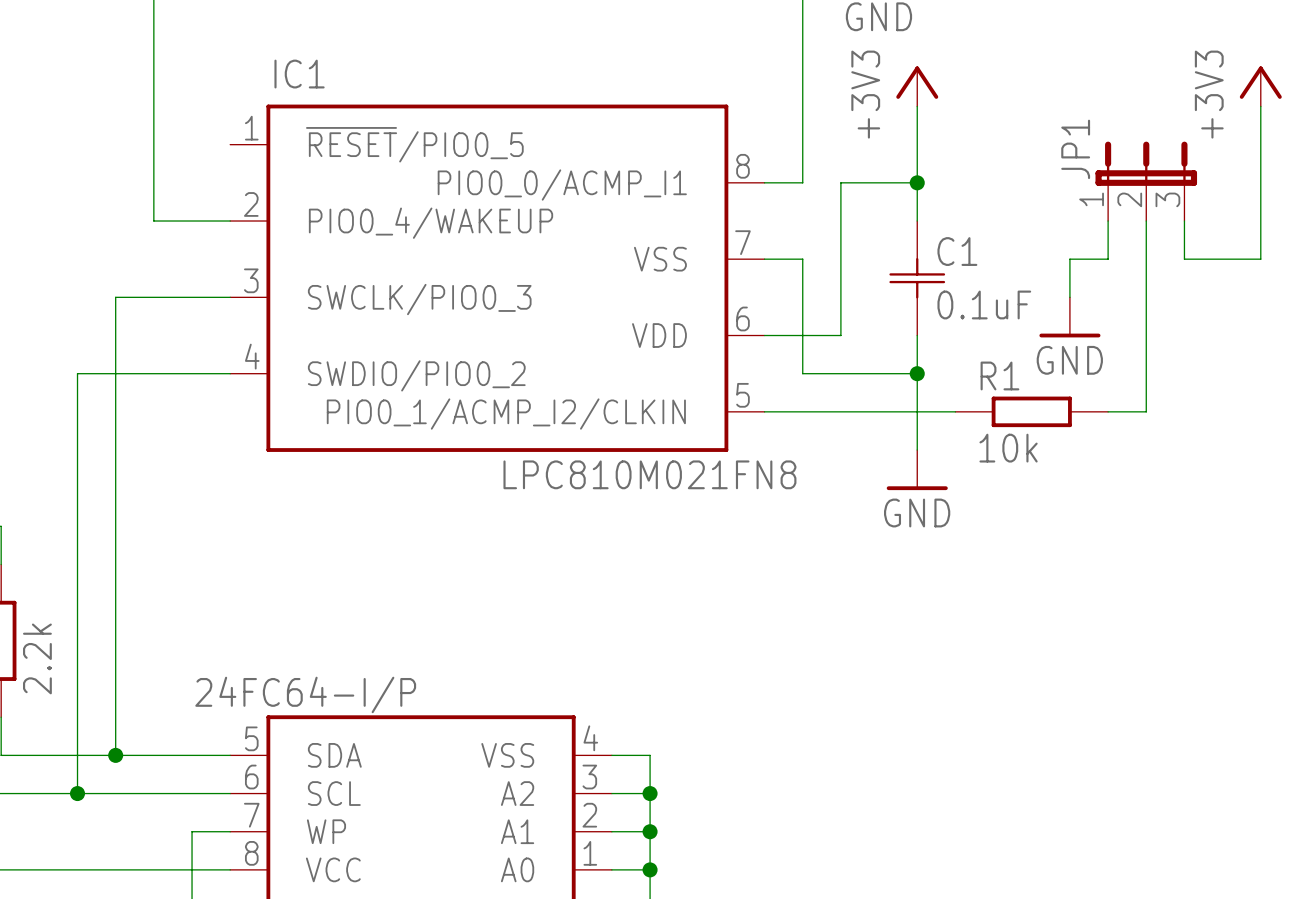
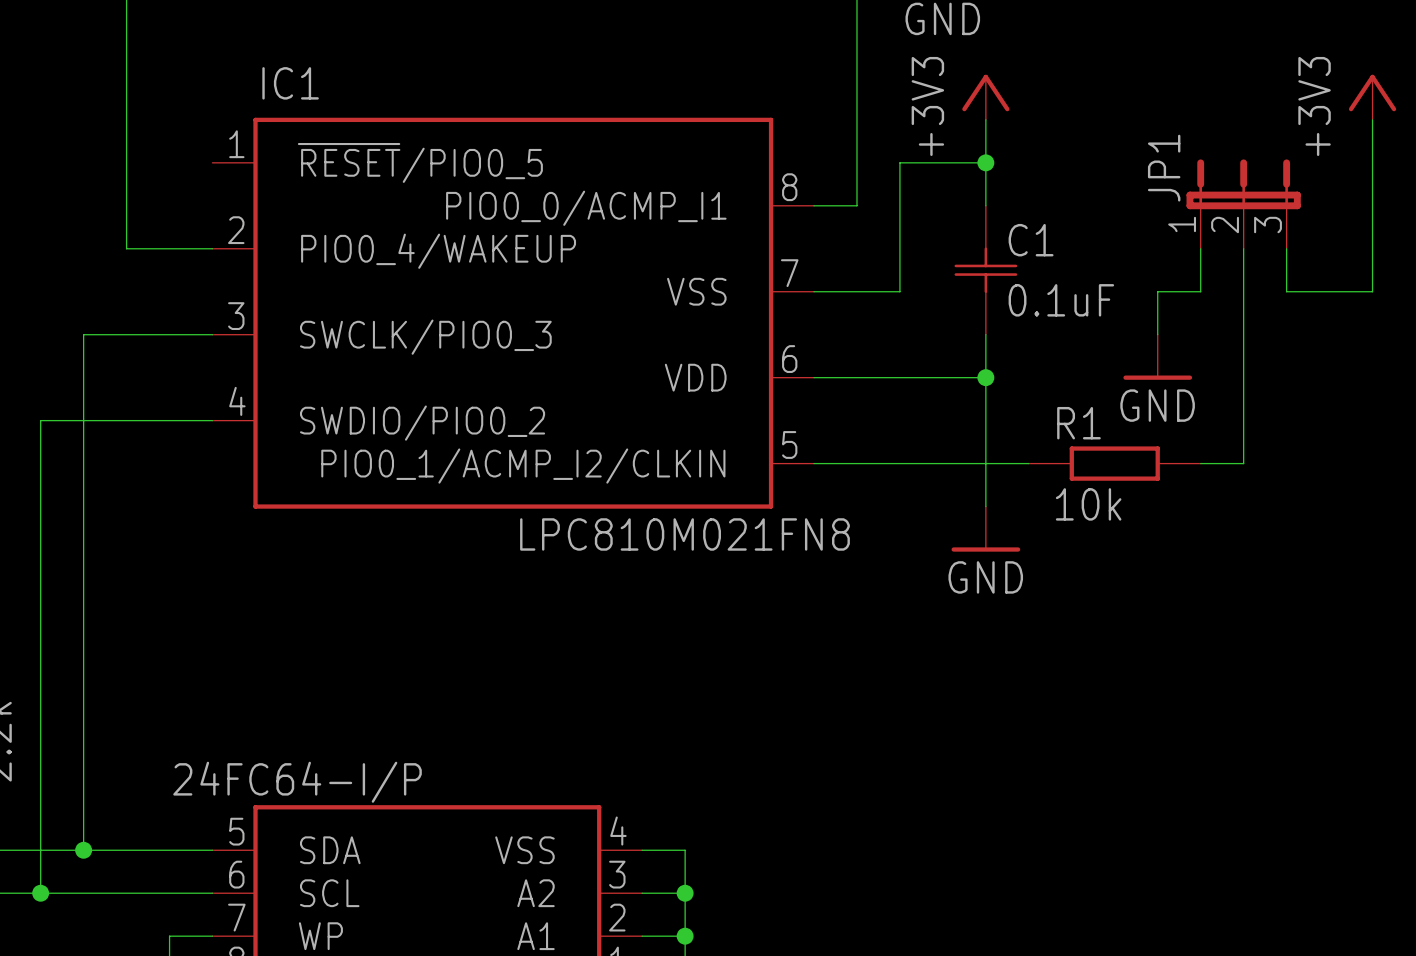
wire: (840, 182) (917, 182) (917, 221) -> (899, 205) (899, 162) (985, 162)
junction position: (917, 182) -> (985, 162)
wire: (802, 259) (802, 373) (917, 373) -> (856, 291) (899, 291)
wire: (840, 259) (840, 335) -> (985, 334) (985, 377) (899, 377)
C1 position: (917, 278) -> (985, 270)
junction position: (917, 373) -> (985, 377)

